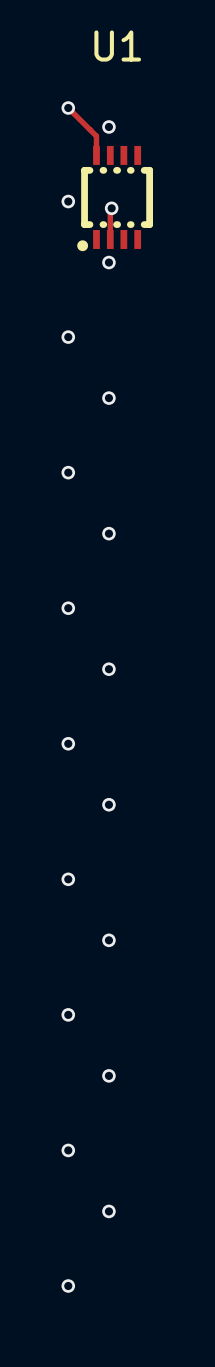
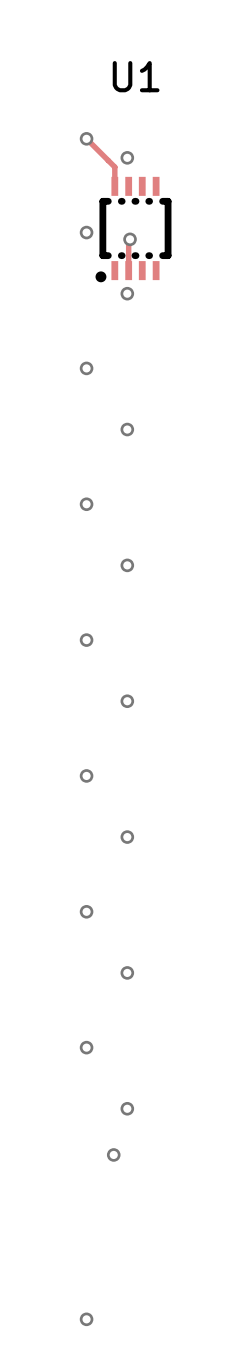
via position: (68, 1150) -> (113, 1154)
via: (108, 1211) -> none

